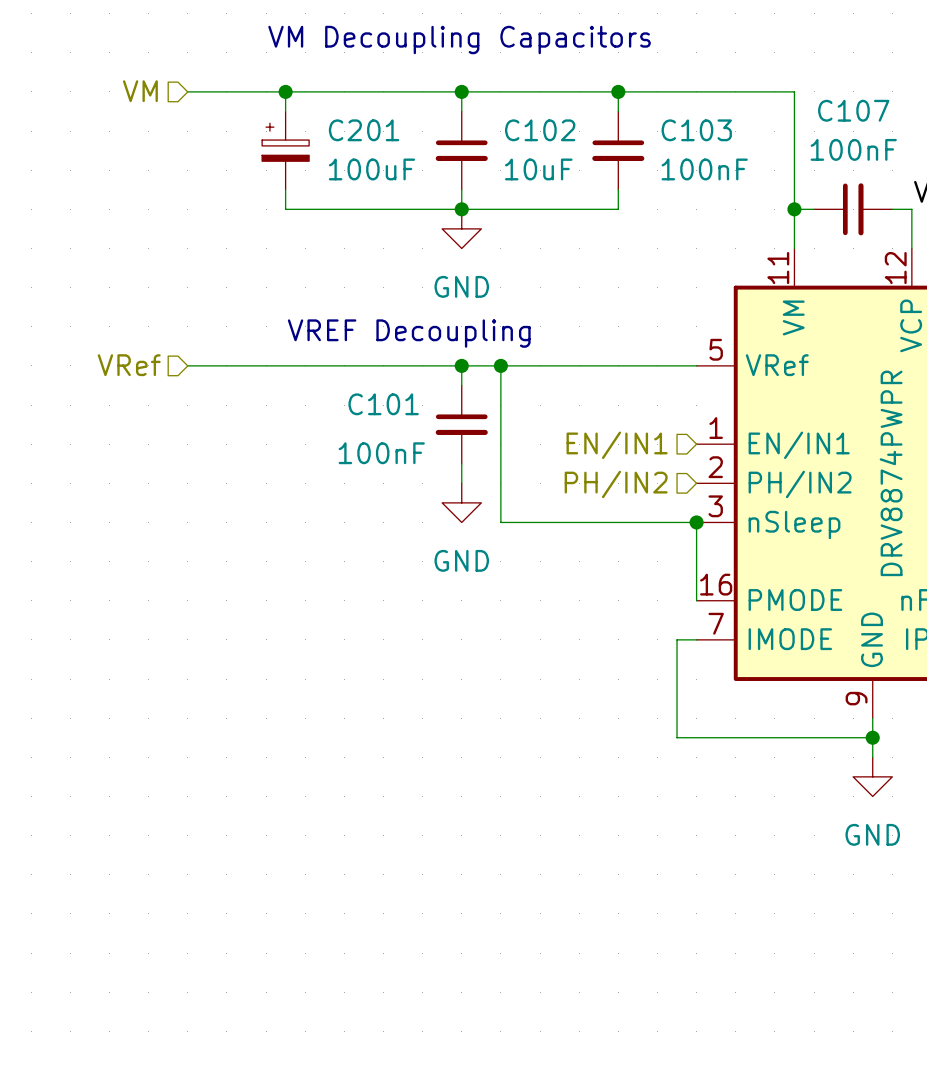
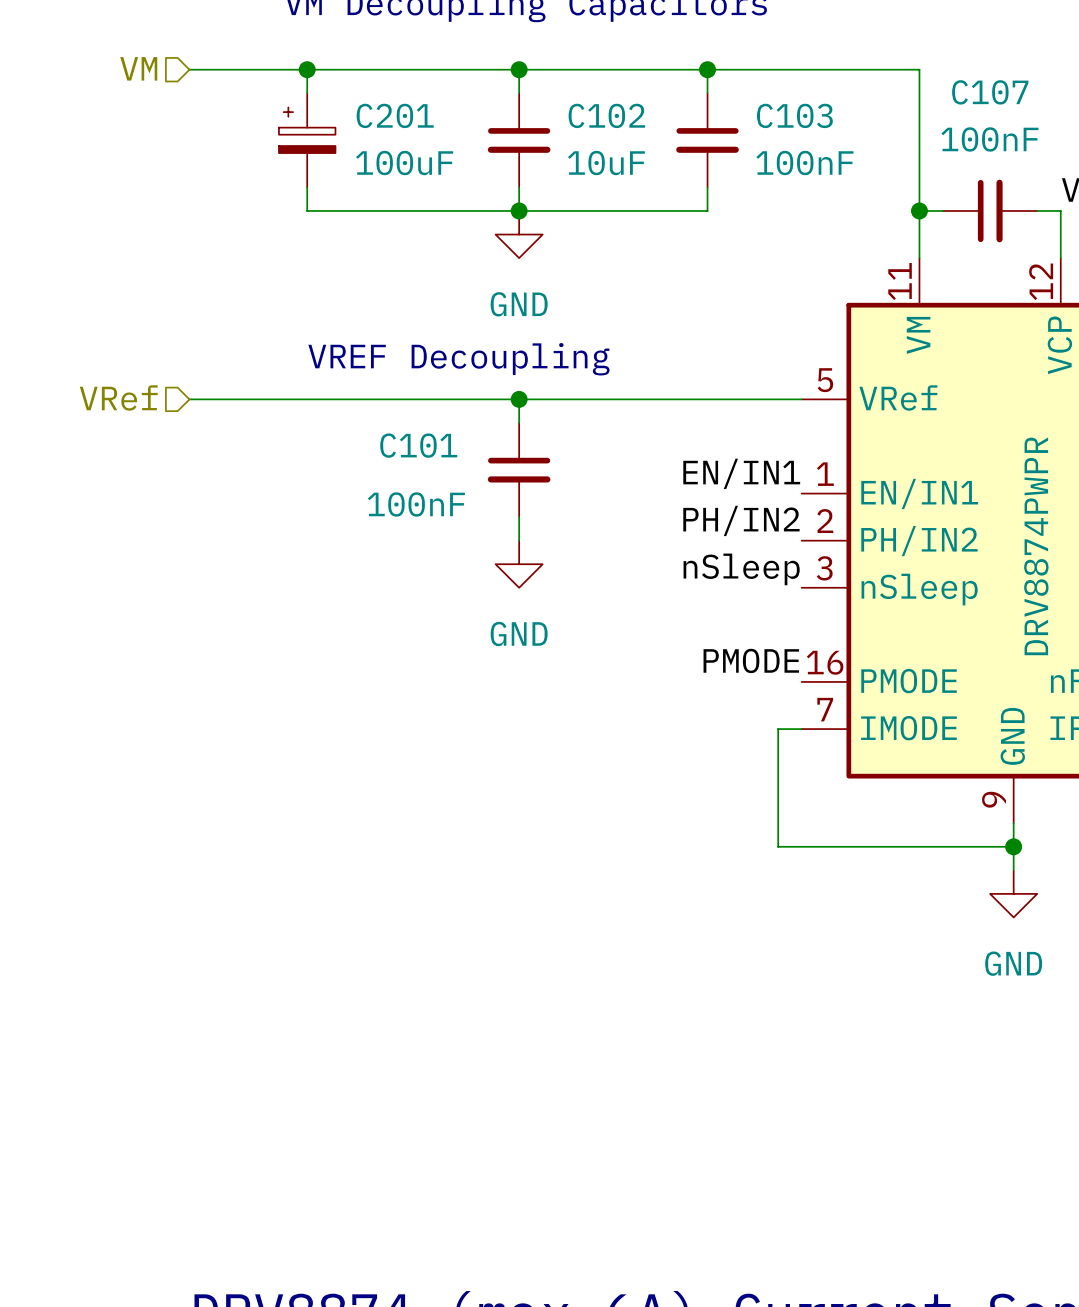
wire: (500, 365) (500, 522) (696, 522) (696, 600) -> none
junction: (500, 365) -> none
label: none -> EN/IN1 (741, 473)
hierarchical label: EN/IN1 (617, 445) -> none
label: none -> PH/IN2 (741, 520)
hierarchical label: PH/IN2 (616, 484) -> none
label: none -> nSleep (741, 569)
junction: (696, 522) -> none
label: none -> PMODE (751, 660)

